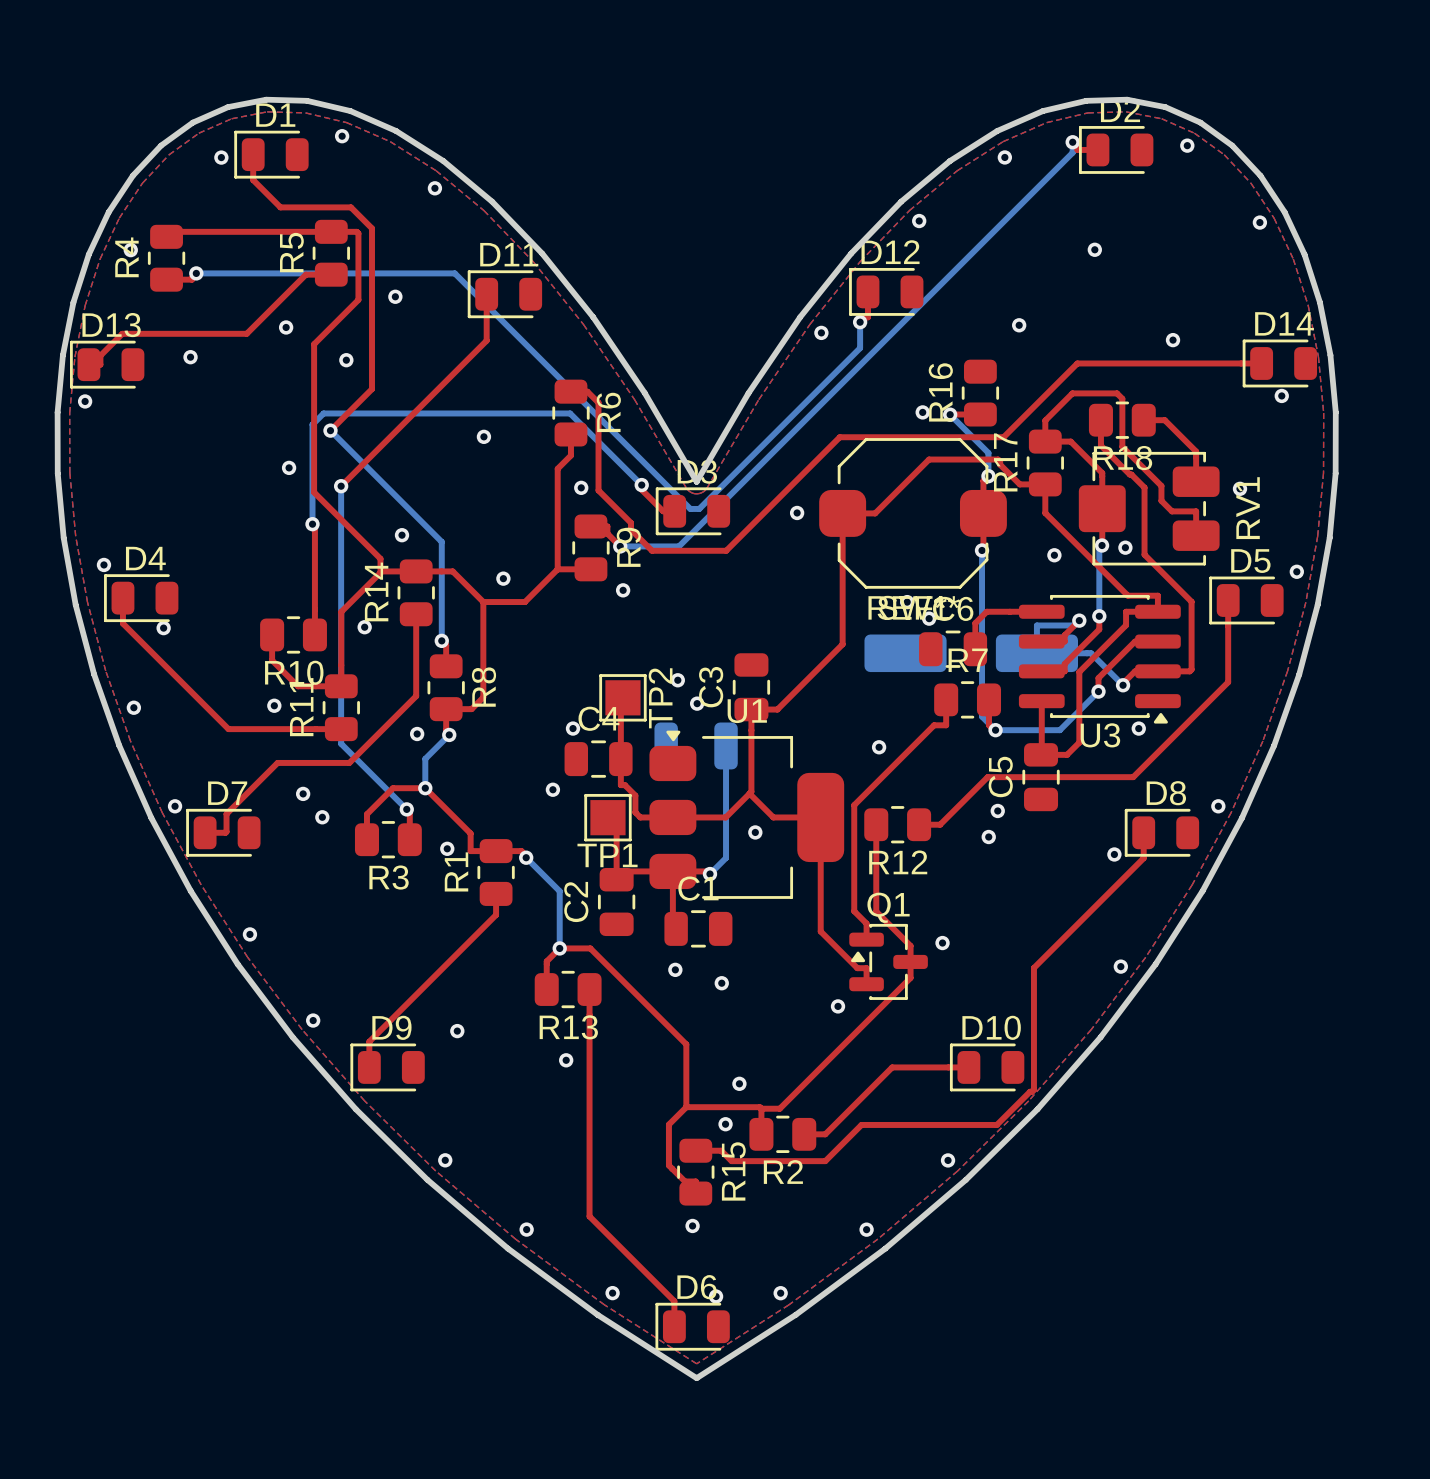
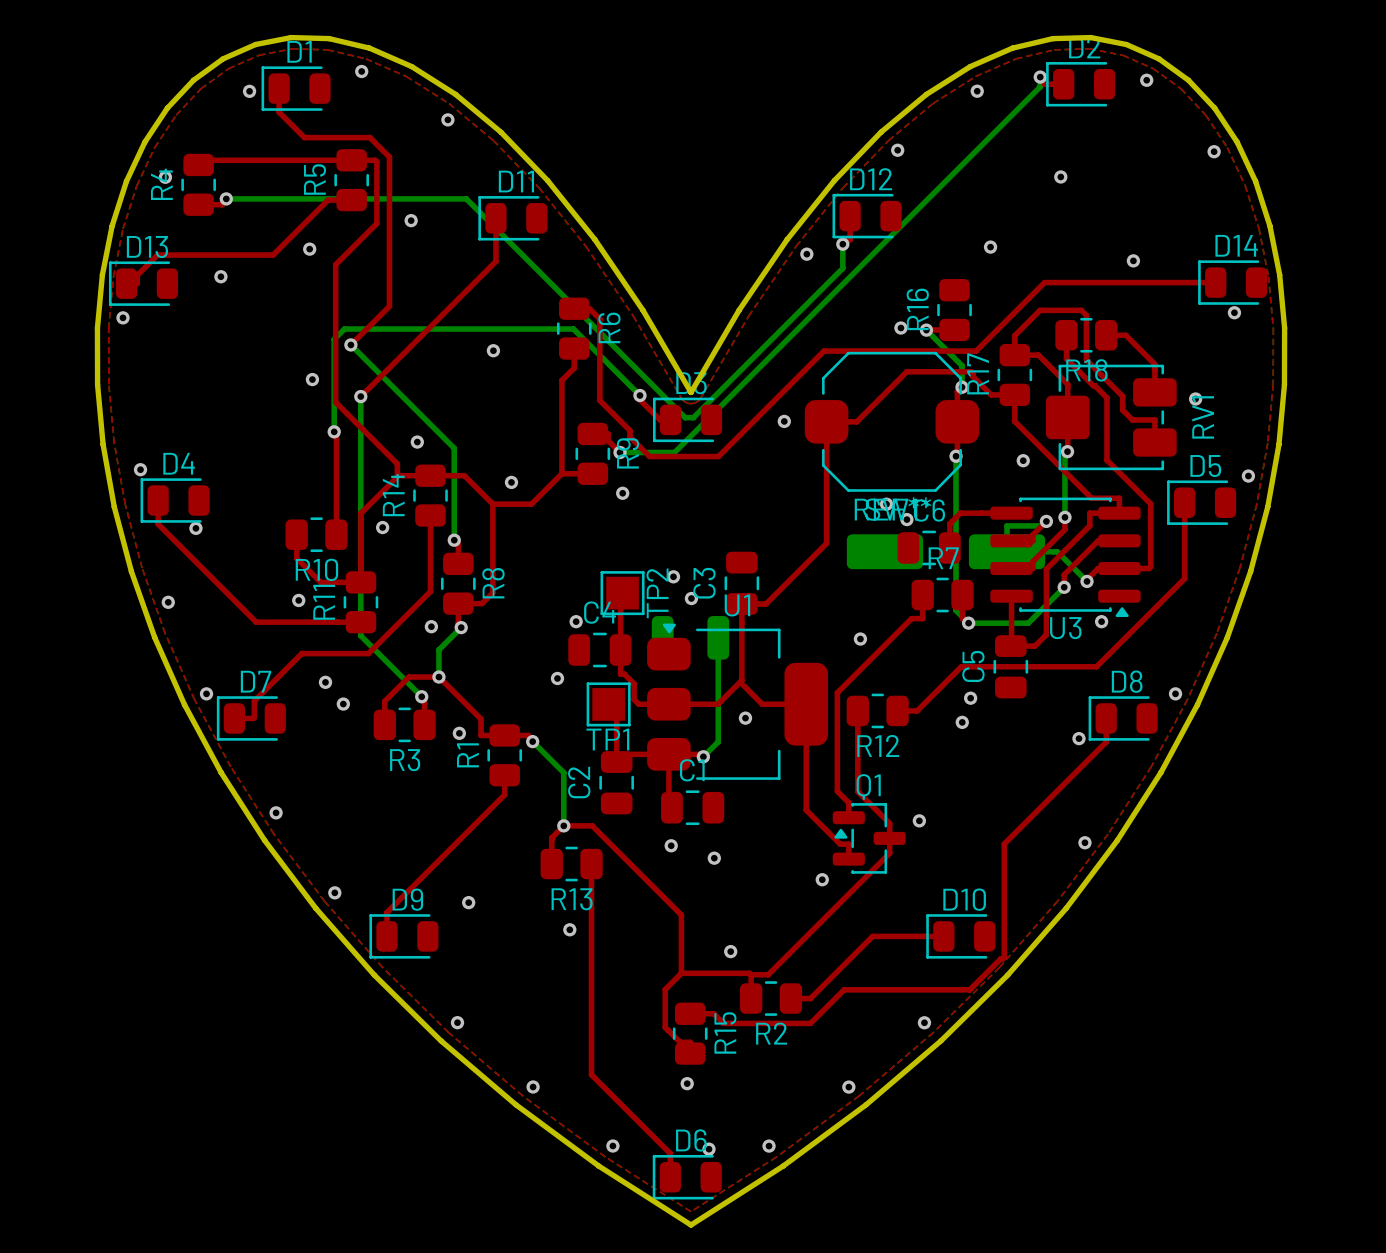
via: (346, 360) -> none
via: (581, 487) -> none
via: (1125, 547) -> none
via: (725, 1124) -> none

